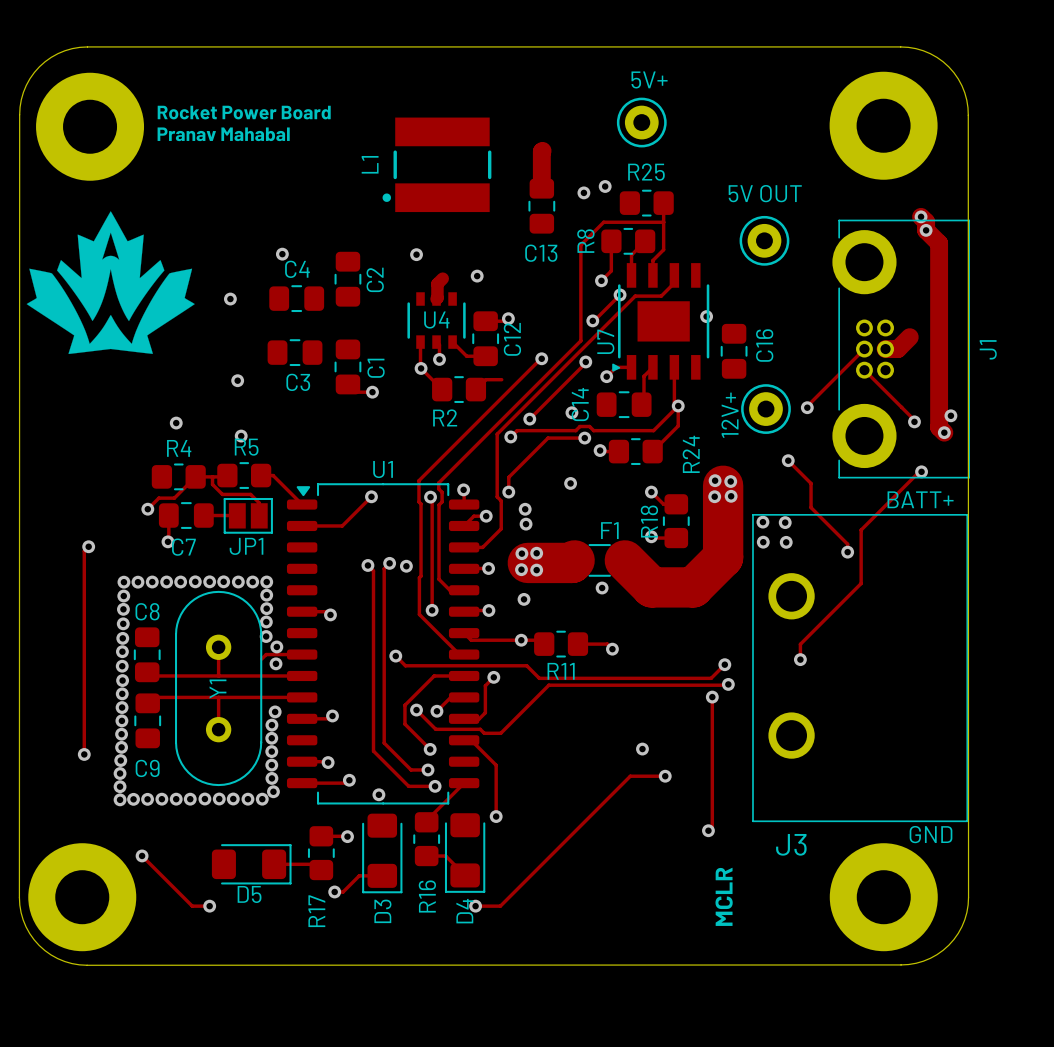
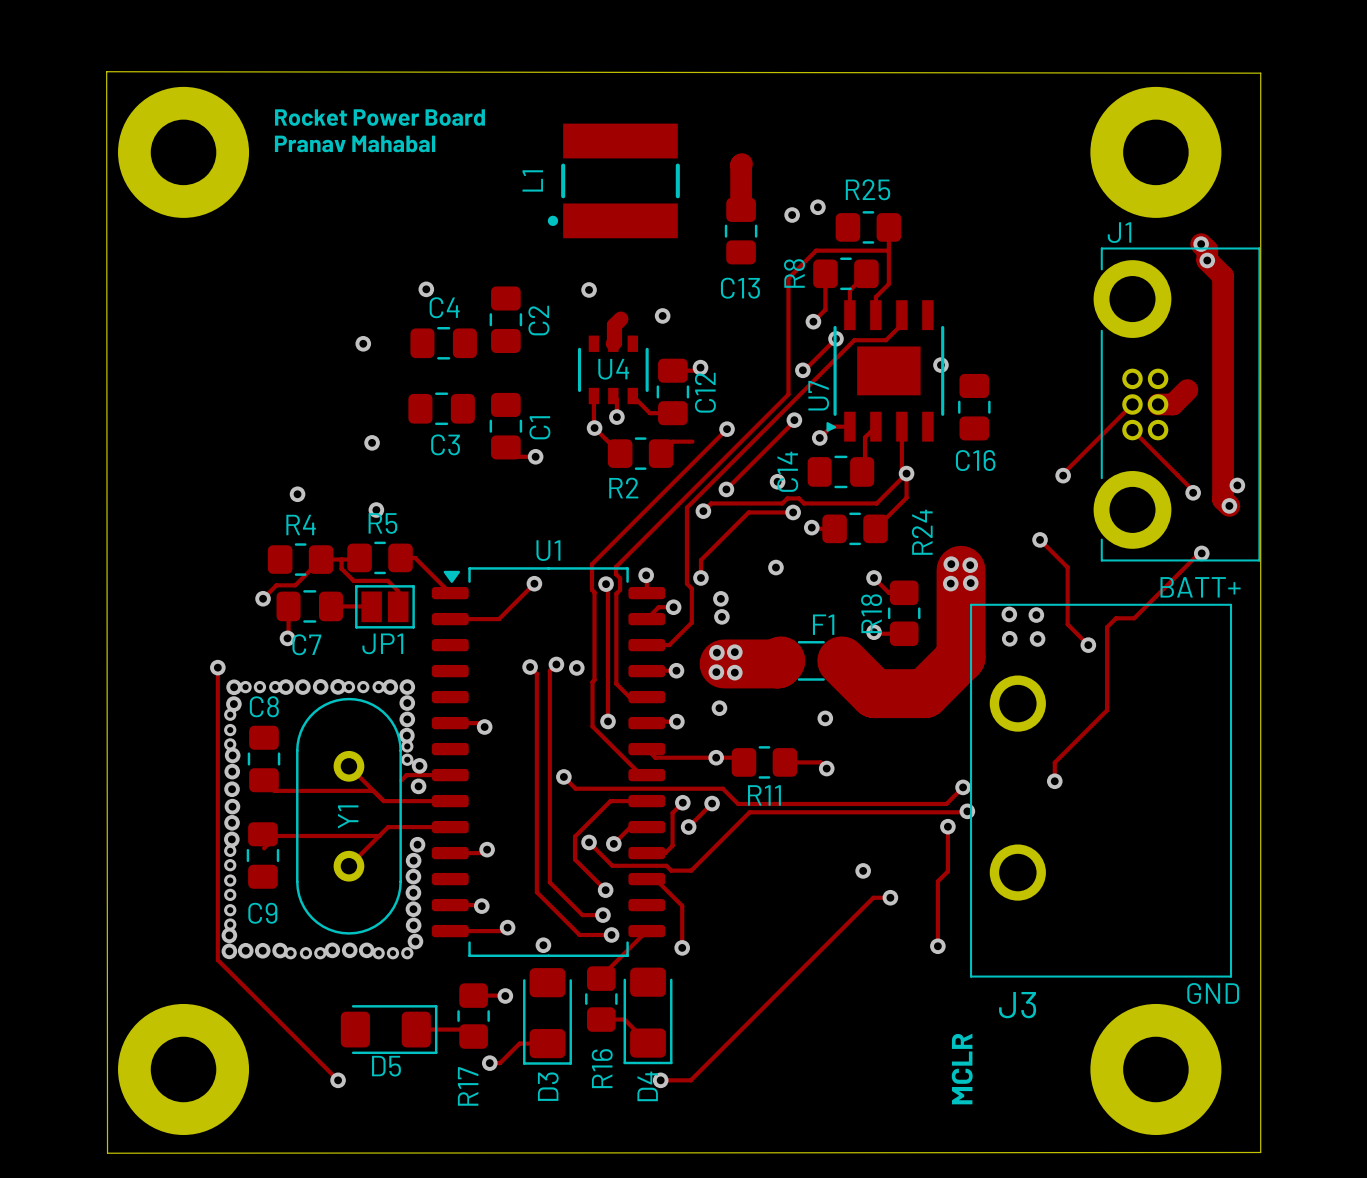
board edge: (87, 46) (900, 46) (915, 48) (930, 53) (948, 66) (958, 78) (964, 92) (968, 115) (968, 897) (966, 912) (961, 926) (948, 945) (936, 954) (923, 961) (901, 964) (87, 965) (72, 963) (57, 958) (39, 945) (26, 926) (21, 912) (19, 897) (19, 114) (23, 92) (30, 78) (39, 66) (51, 57) (65, 50) (79, 47) (87, 46) -> (106, 71) (107, 1153) (1260, 1152) (1260, 73) (106, 71)
5V+: (641, 122) -> none
part position: (883, 125) -> (1155, 152)
part position: (90, 126) -> (183, 152)
drawing: [26, 211, 195, 354] -> none
5V OUT: (764, 240) -> none
C16 name rotation: 0° (764, 345) -> 90° clockwise (975, 460)
J1 name rotation: 0° (988, 349) -> 90° clockwise (1119, 232)
J1 name position: J1 (988, 349) -> J1 (1119, 232)
track: (541, 358) (530, 369) -> none
via position: (541, 358) -> (727, 429)
12V+: (765, 409) -> none
track: (811, 507) (847, 544) (847, 552) -> (1067, 596) (1067, 624) (1088, 645)
track: (865, 525) (861, 530) (861, 583) (843, 601) -> (1134, 618) (1115, 618) (1107, 627) (1107, 710)
track: (88, 546) (84, 551) (84, 754) -> none
via: (88, 546) -> none
via position: (847, 552) -> (1088, 645)
via: none -> (217, 667)
via: (223, 581) -> none
via: none -> (245, 687)
via: (137, 582) -> none
via: none -> (259, 687)
via: (152, 582) -> none
via: none -> (275, 687)
via: none -> (348, 687)
via: none -> (363, 687)
via: (238, 582) -> none
via: none -> (378, 687)
via position: (602, 588) -> (825, 718)
via: none -> (230, 714)
via: (123, 609) -> none
via: none -> (230, 730)
via: (123, 623) -> none
via: none -> (230, 744)
via: none -> (407, 746)
via: (266, 636) -> none
via: none -> (407, 759)
track: (218, 647) (218, 675) -> (348, 766) (383, 801)
C8 position: (147, 654) -> (264, 758)
track: none -> (264, 780) (274, 790) (373, 790)
J3 position: (860, 668) -> (1101, 790)
track: (147, 673) (149, 675) (247, 675) -> none
track: none -> (712, 803) (688, 827)
via: none -> (712, 803)
track: (218, 697) (218, 729) -> (388, 827) (348, 866)
track: (250, 697) (153, 697) (147, 703) -> none
via: none -> (688, 827)
track: none -> (379, 835) (276, 835) (264, 848)
via: none -> (230, 850)
via: (121, 720) -> none
via: none -> (230, 865)
via: none -> (863, 870)
track: (712, 733) (712, 826) (708, 830) -> (947, 871) (937, 881) (937, 946)
via: (121, 734) -> none
via: none -> (230, 880)
via: (121, 747) -> none
via: (642, 749) -> none
via: none -> (230, 894)
via: (84, 754) -> none
via: none -> (890, 897)
via: (120, 760) -> none
track: (493, 762) (496, 765) (496, 816) -> (682, 905) (682, 947)
via: none -> (230, 910)
via: (120, 773) -> none
track: (630, 776) (665, 776) -> (848, 922) (873, 897) (890, 897)
via: (665, 776) -> none
via: none -> (230, 924)
via: none -> (937, 946)
via: (176, 799) -> none
via: (190, 799) -> none
via: (247, 799) -> none
via: (262, 799) -> none
via: none -> (290, 953)
via: none -> (305, 953)
via: none -> (320, 953)
via: none -> (378, 953)
via: none -> (392, 953)
via: none -> (407, 953)
via position: (496, 816) -> (682, 947)
via: (708, 830) -> none
track: (142, 855) (192, 906) (209, 906) -> (217, 667) (217, 960) (338, 1080)
via: (142, 855) -> none

